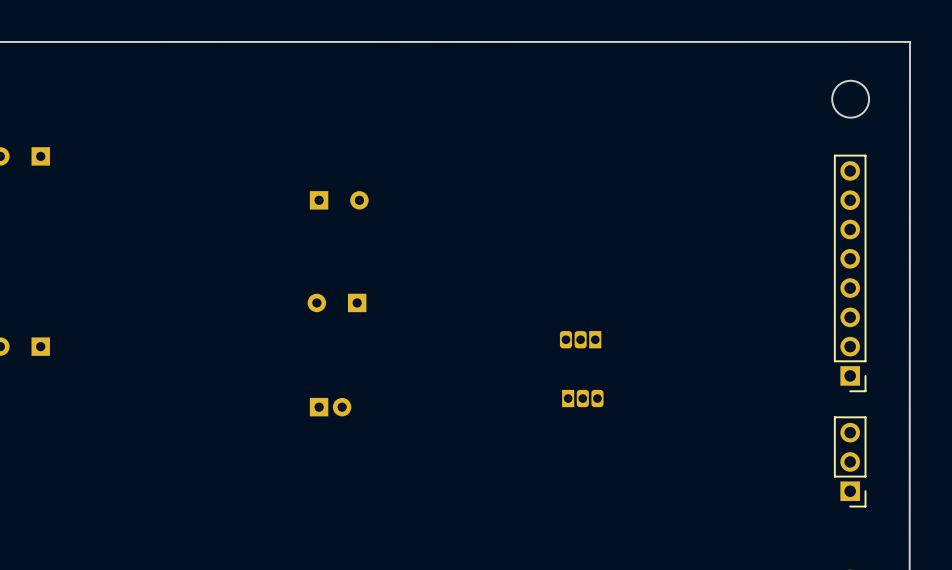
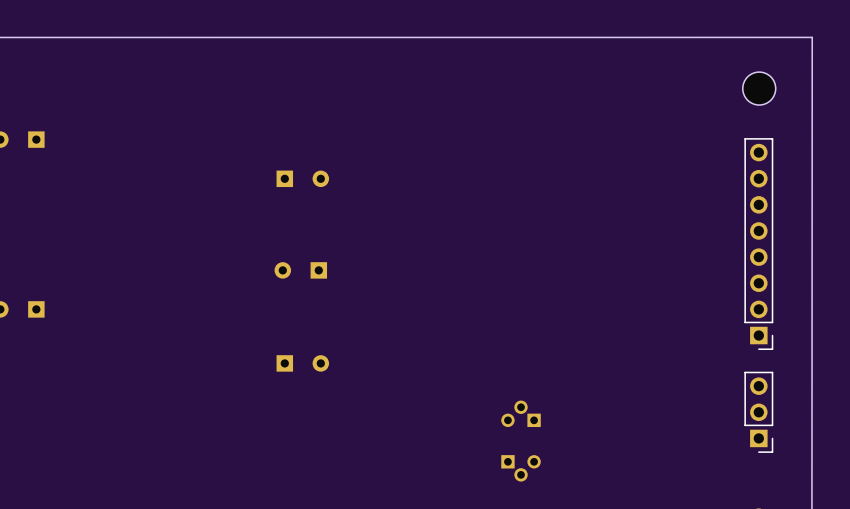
part: (580, 339) -> none
part footprint: [309, 397, 352, 417] -> [276, 355, 330, 372]
part: (582, 398) -> none
part: none -> (521, 413)
part: none -> (521, 468)

